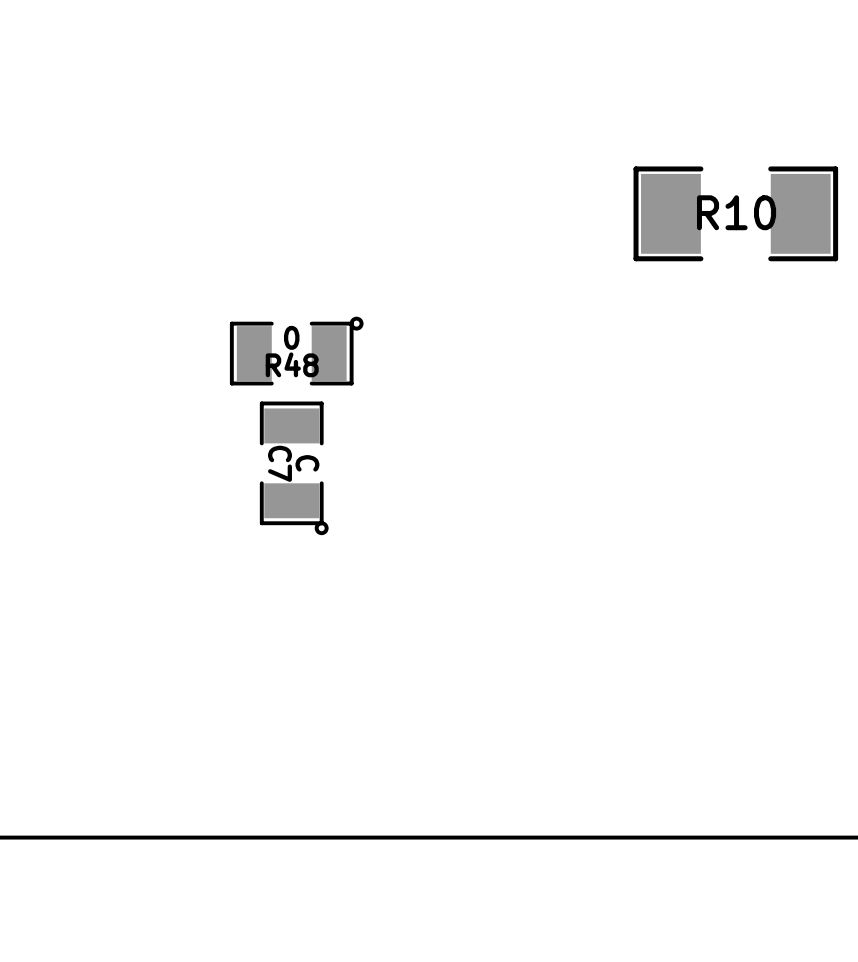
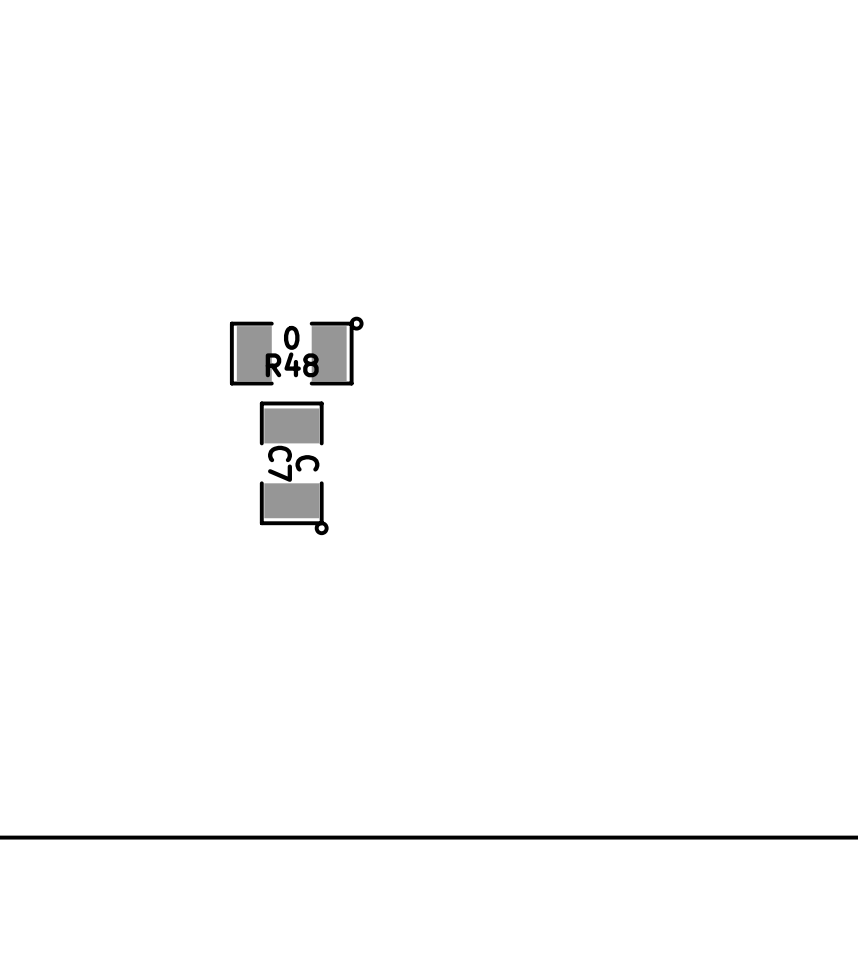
R10: (735, 213) -> none

